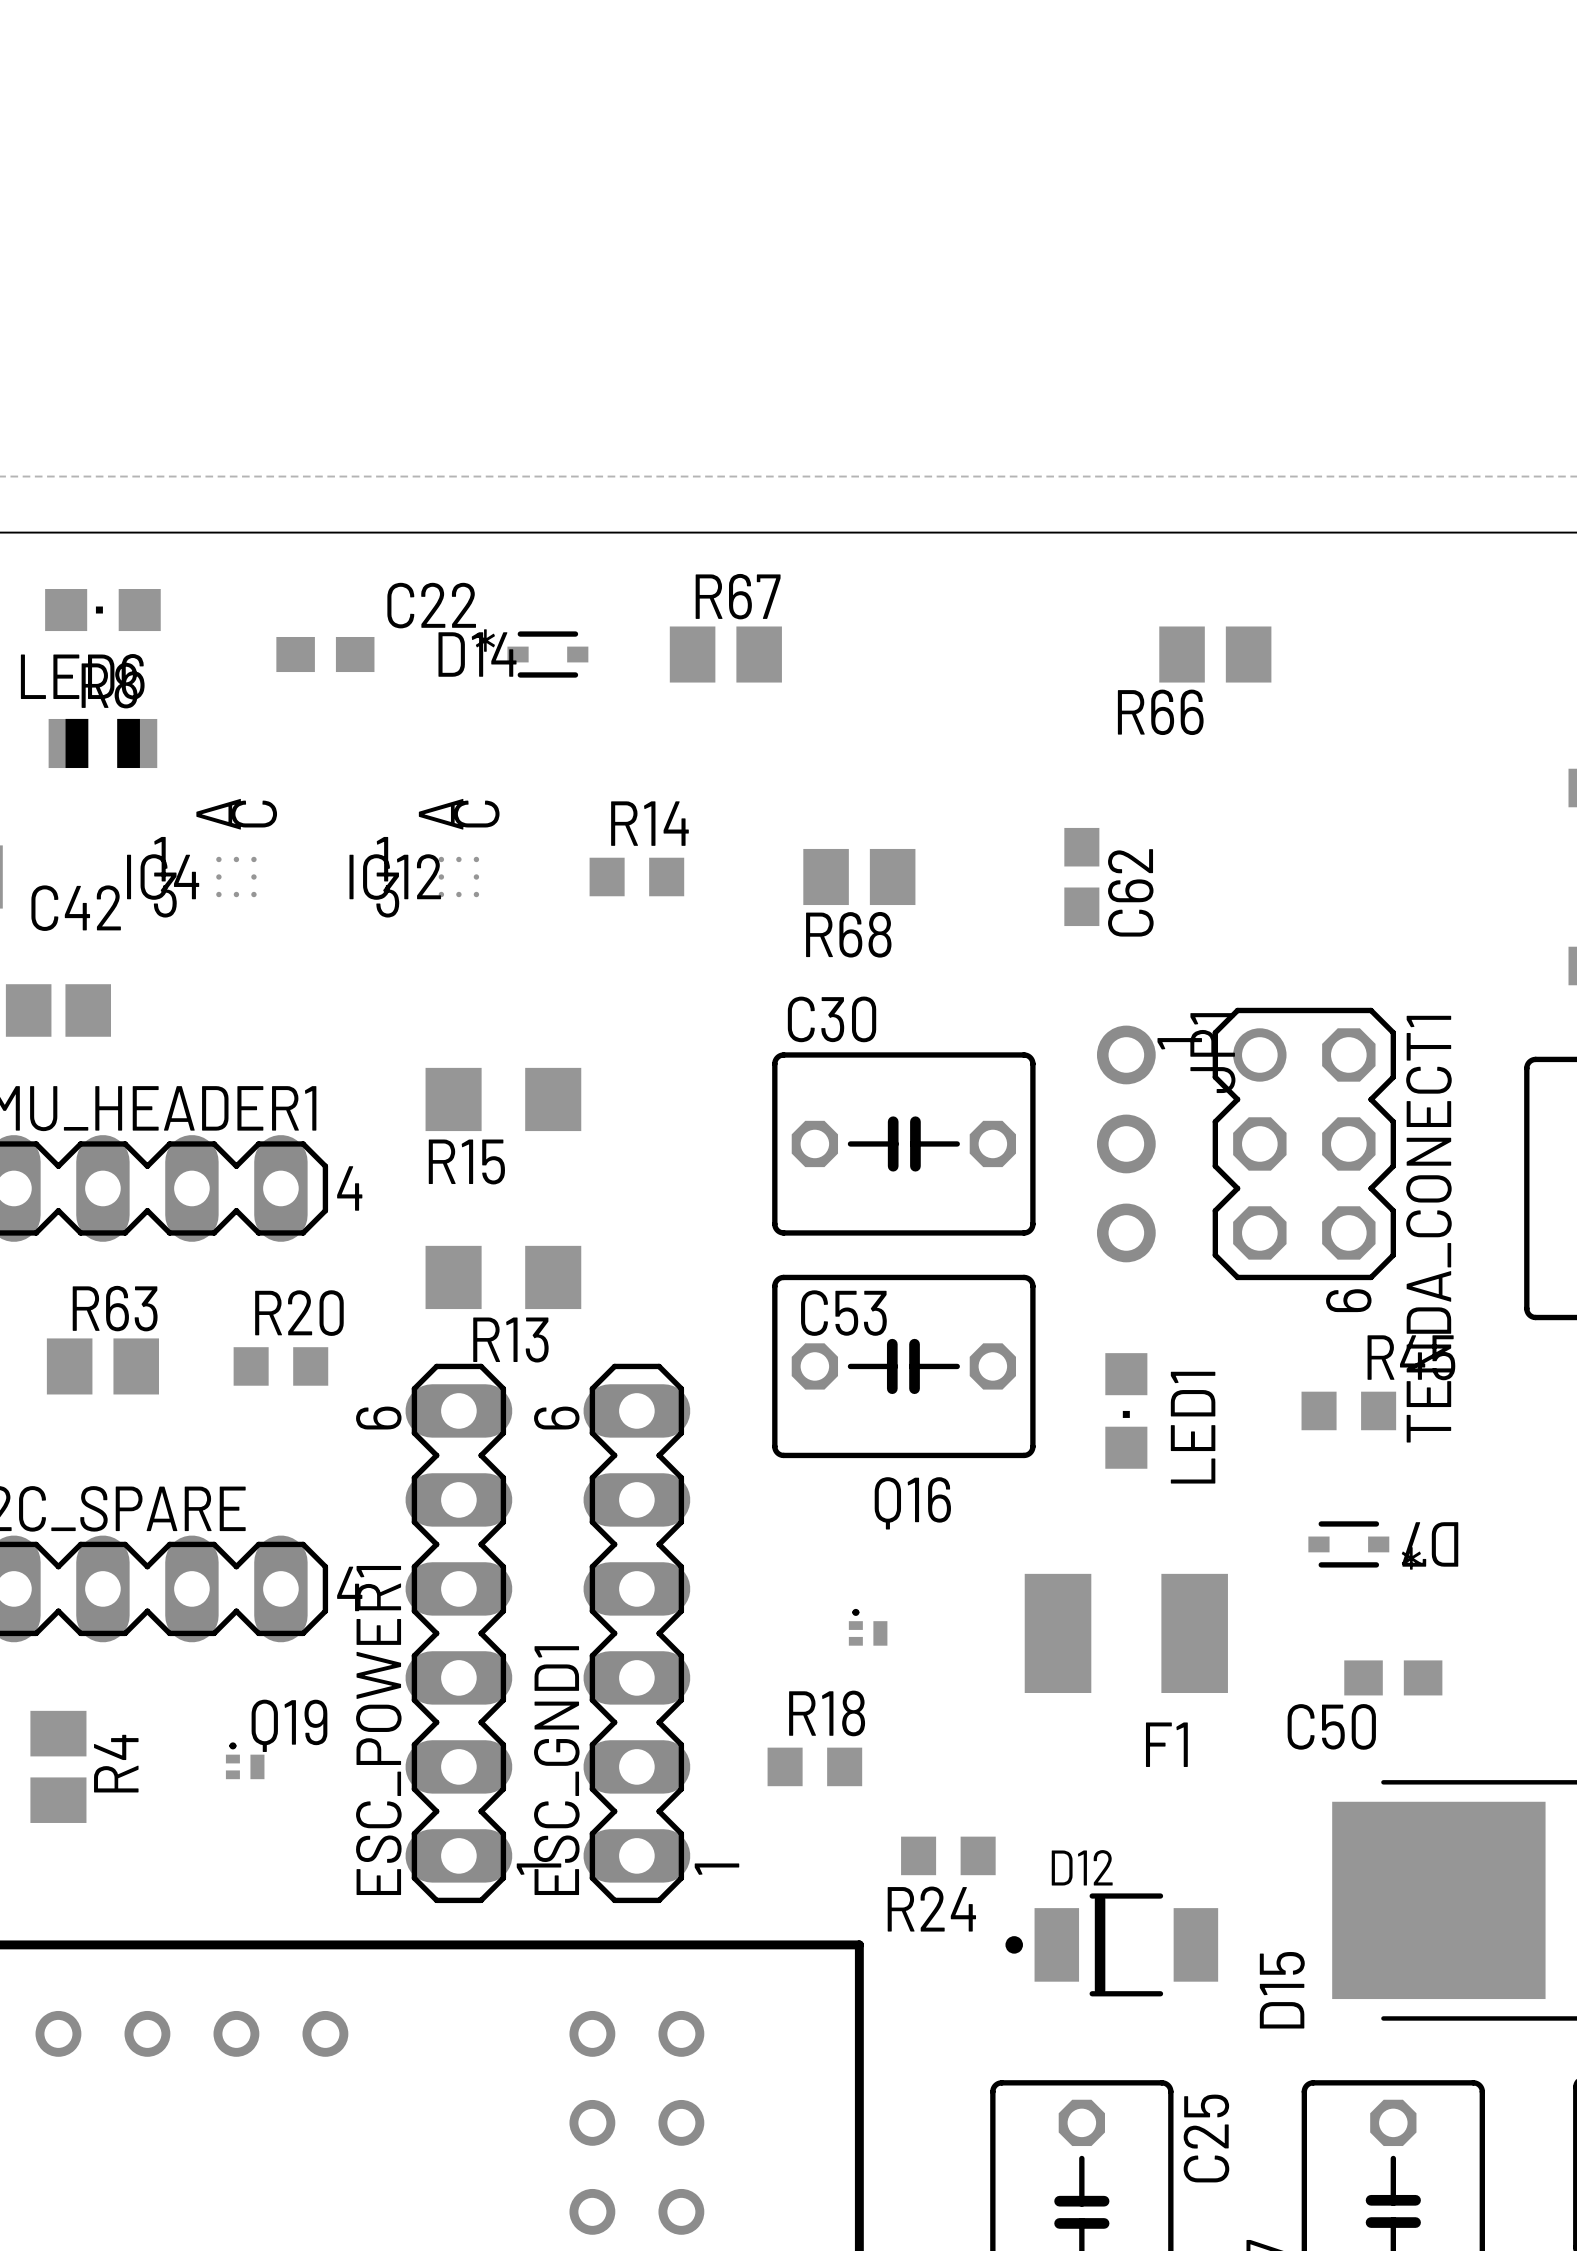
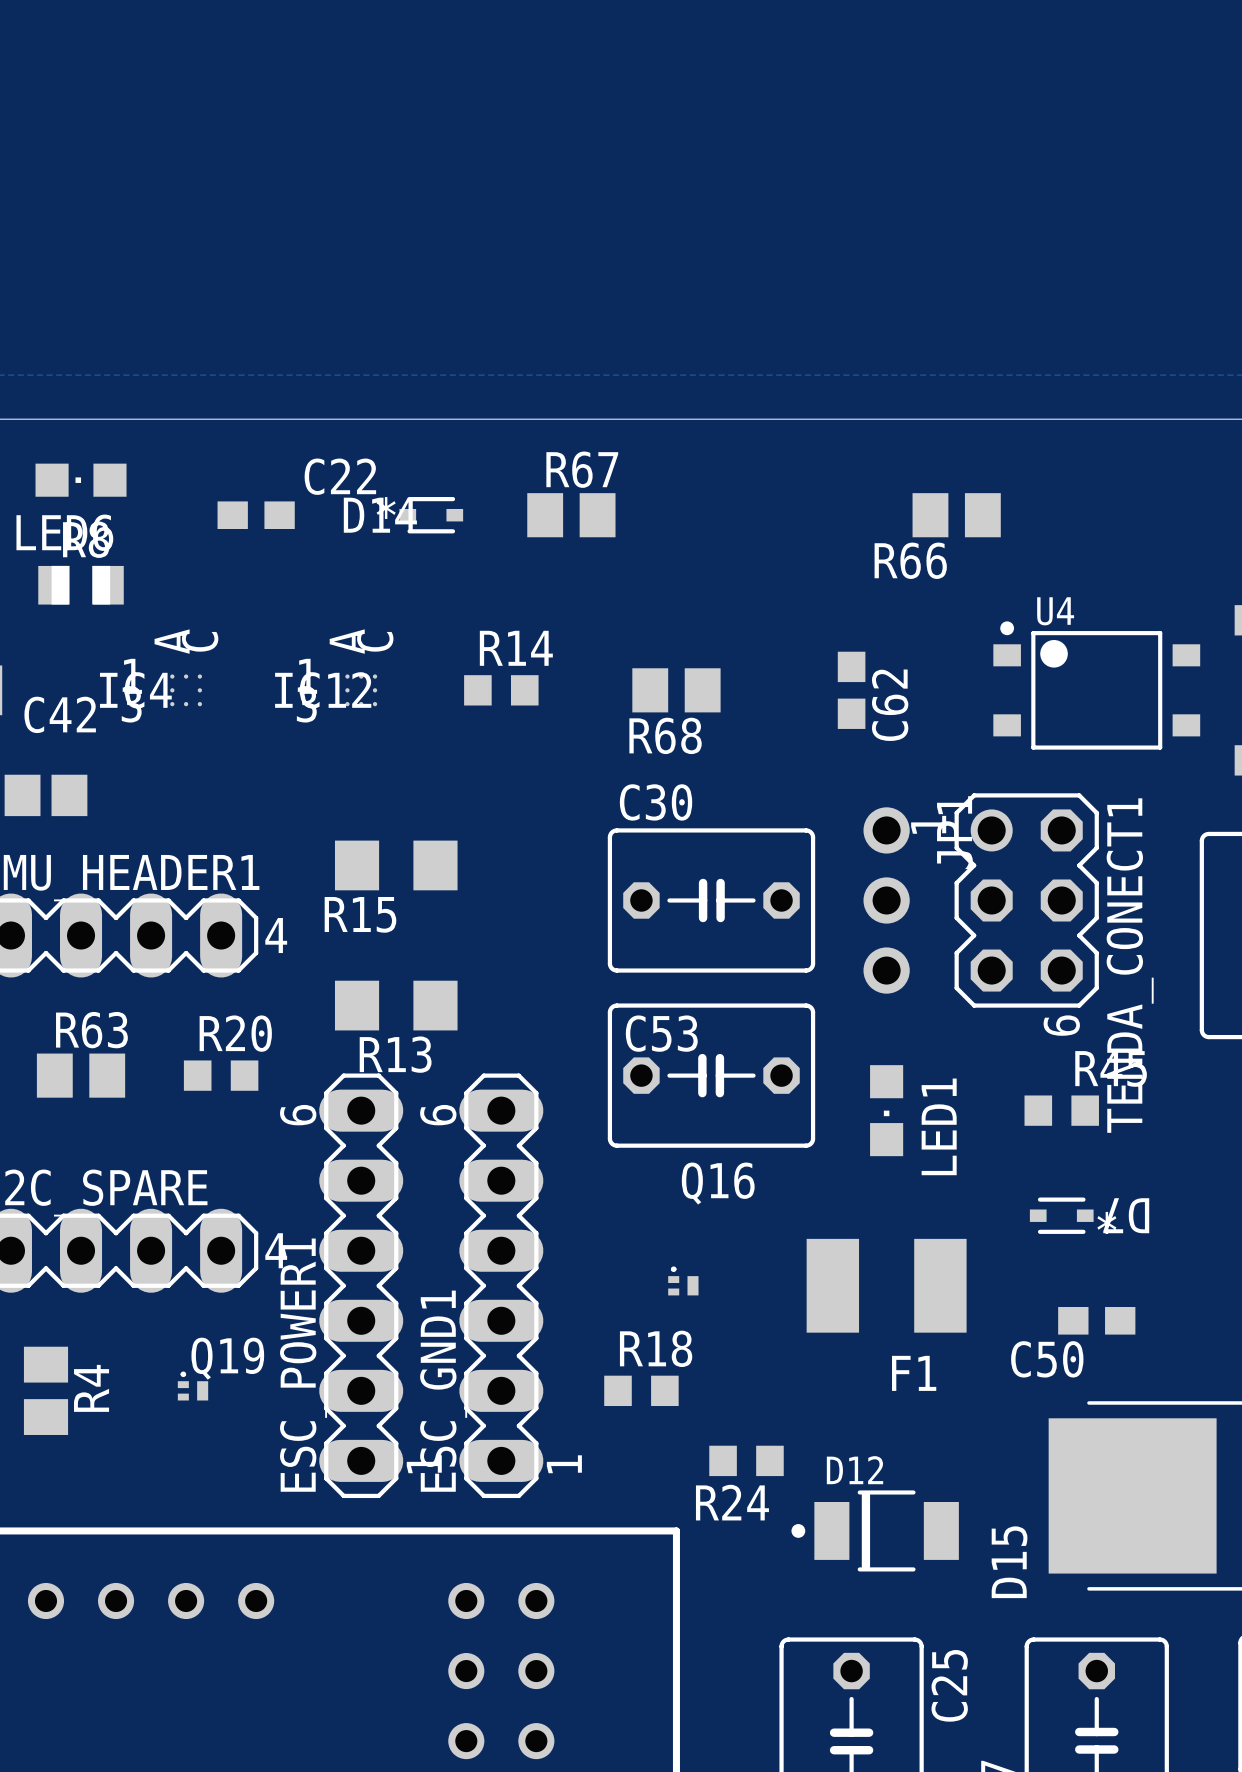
U4: none -> (1096, 685)

